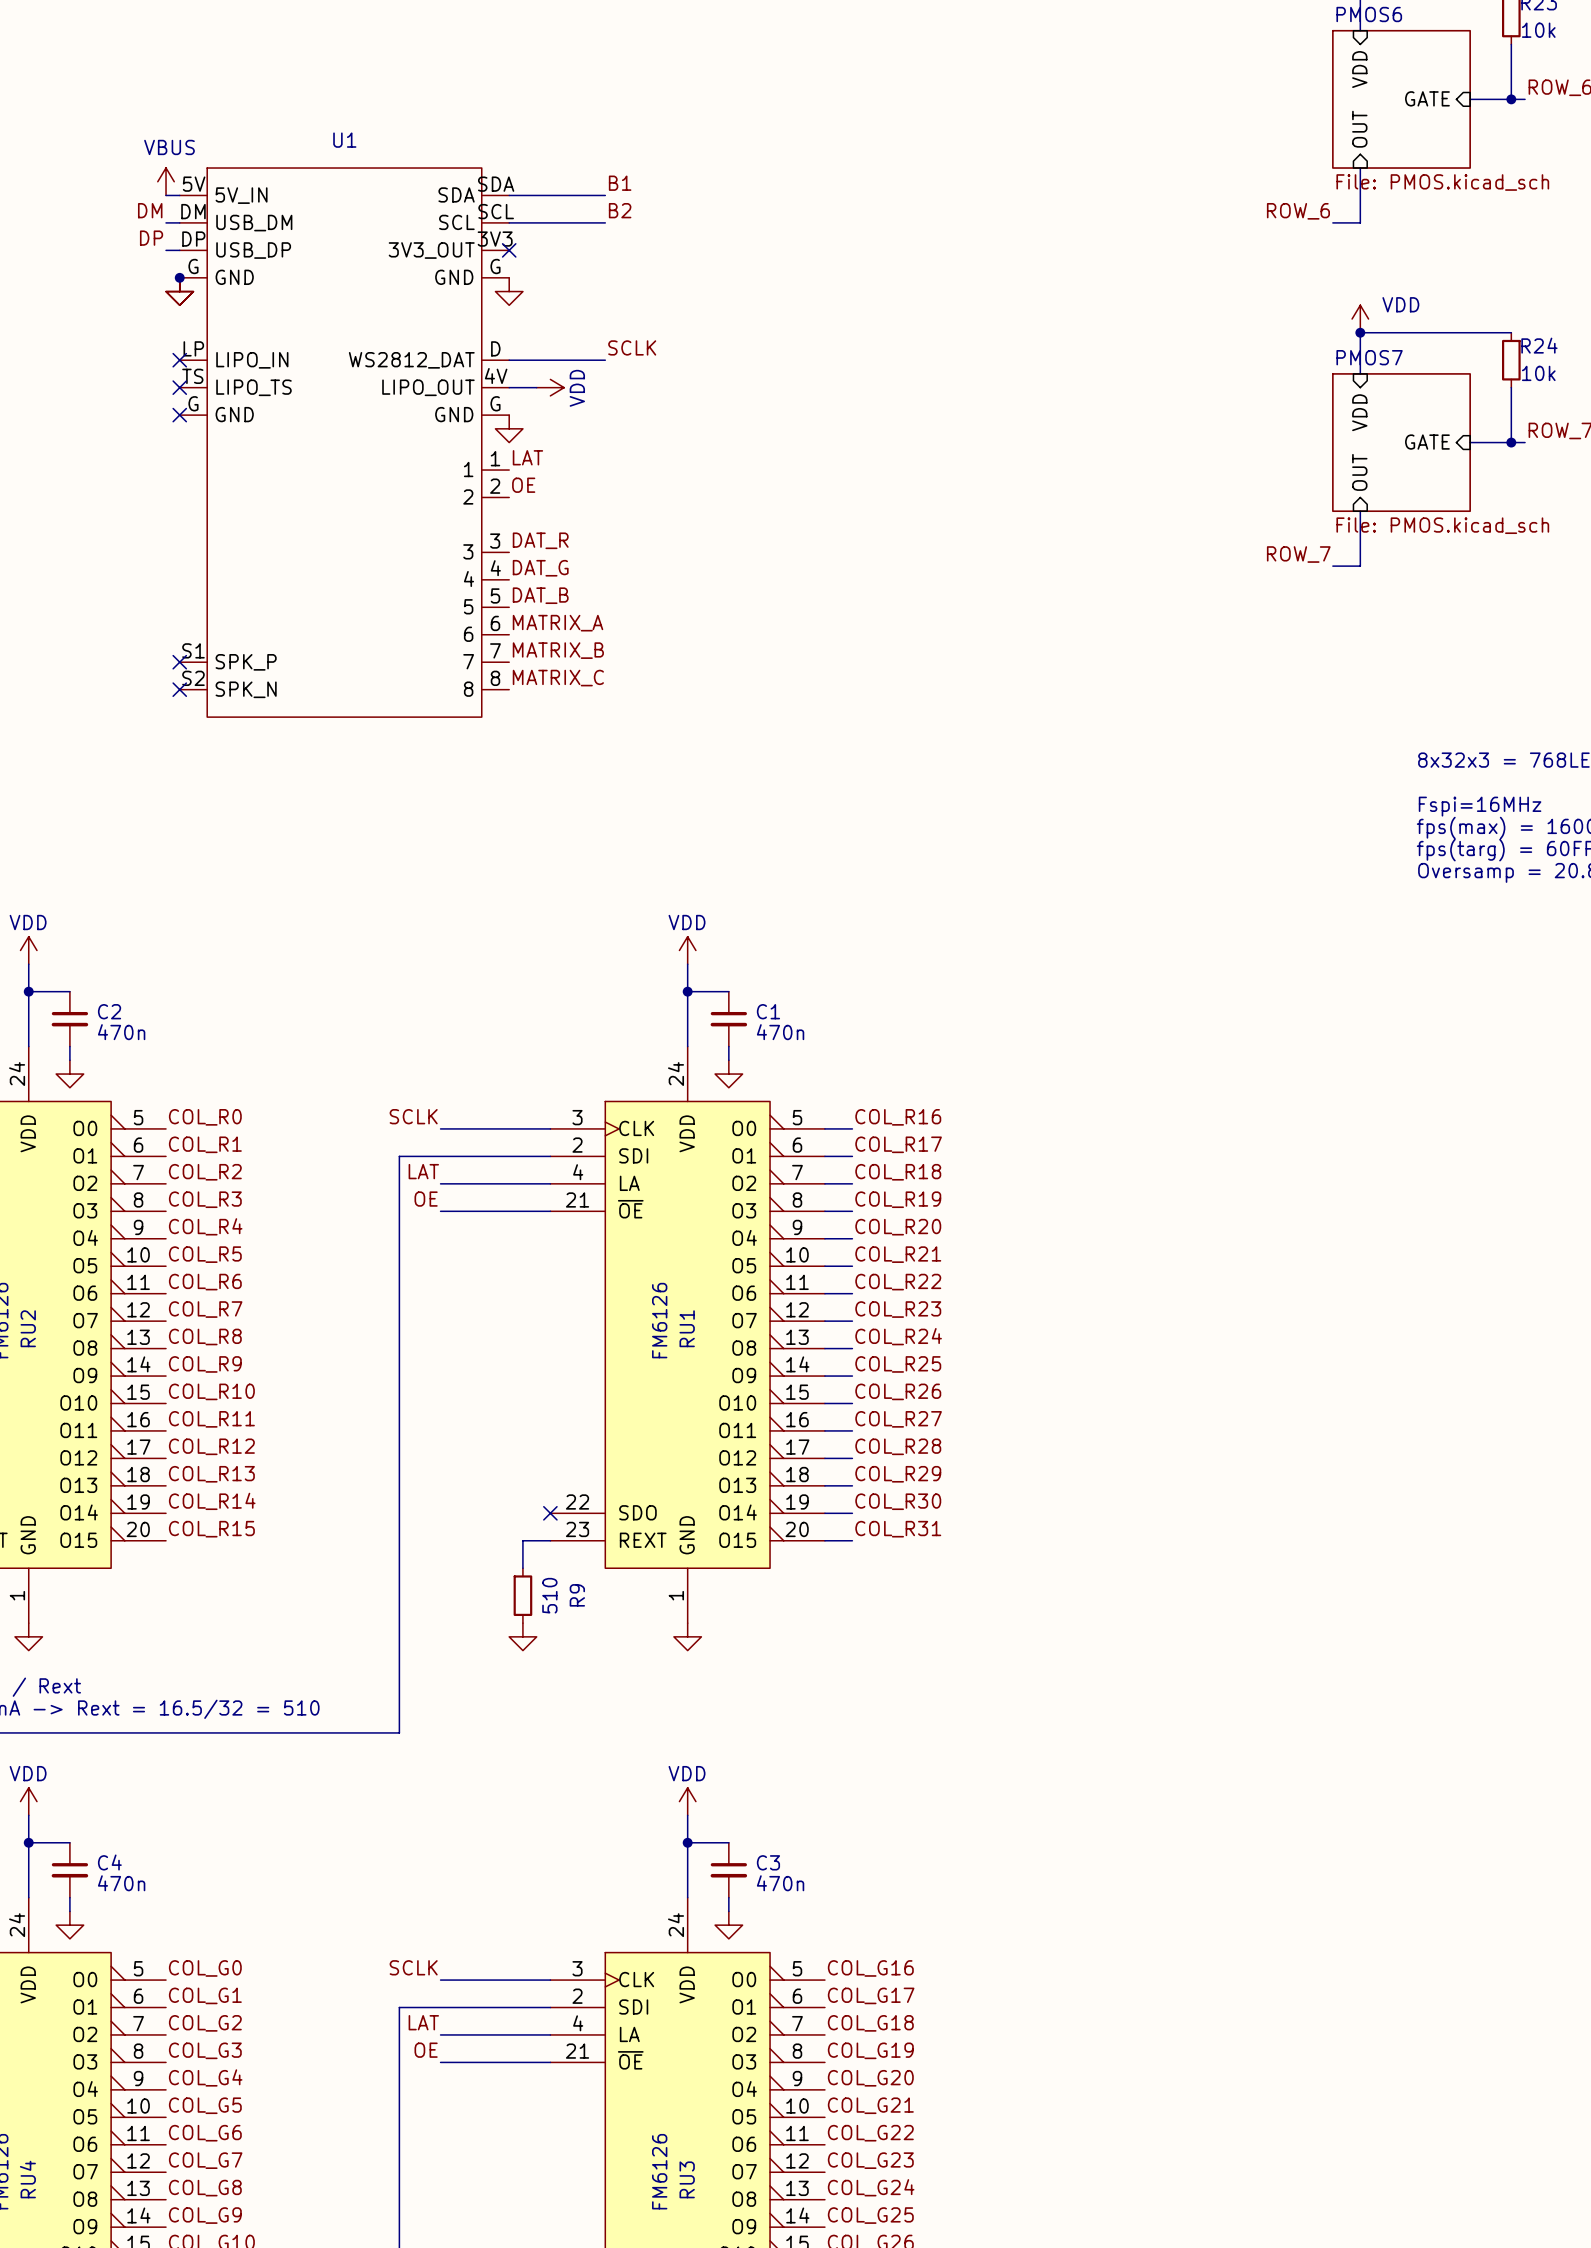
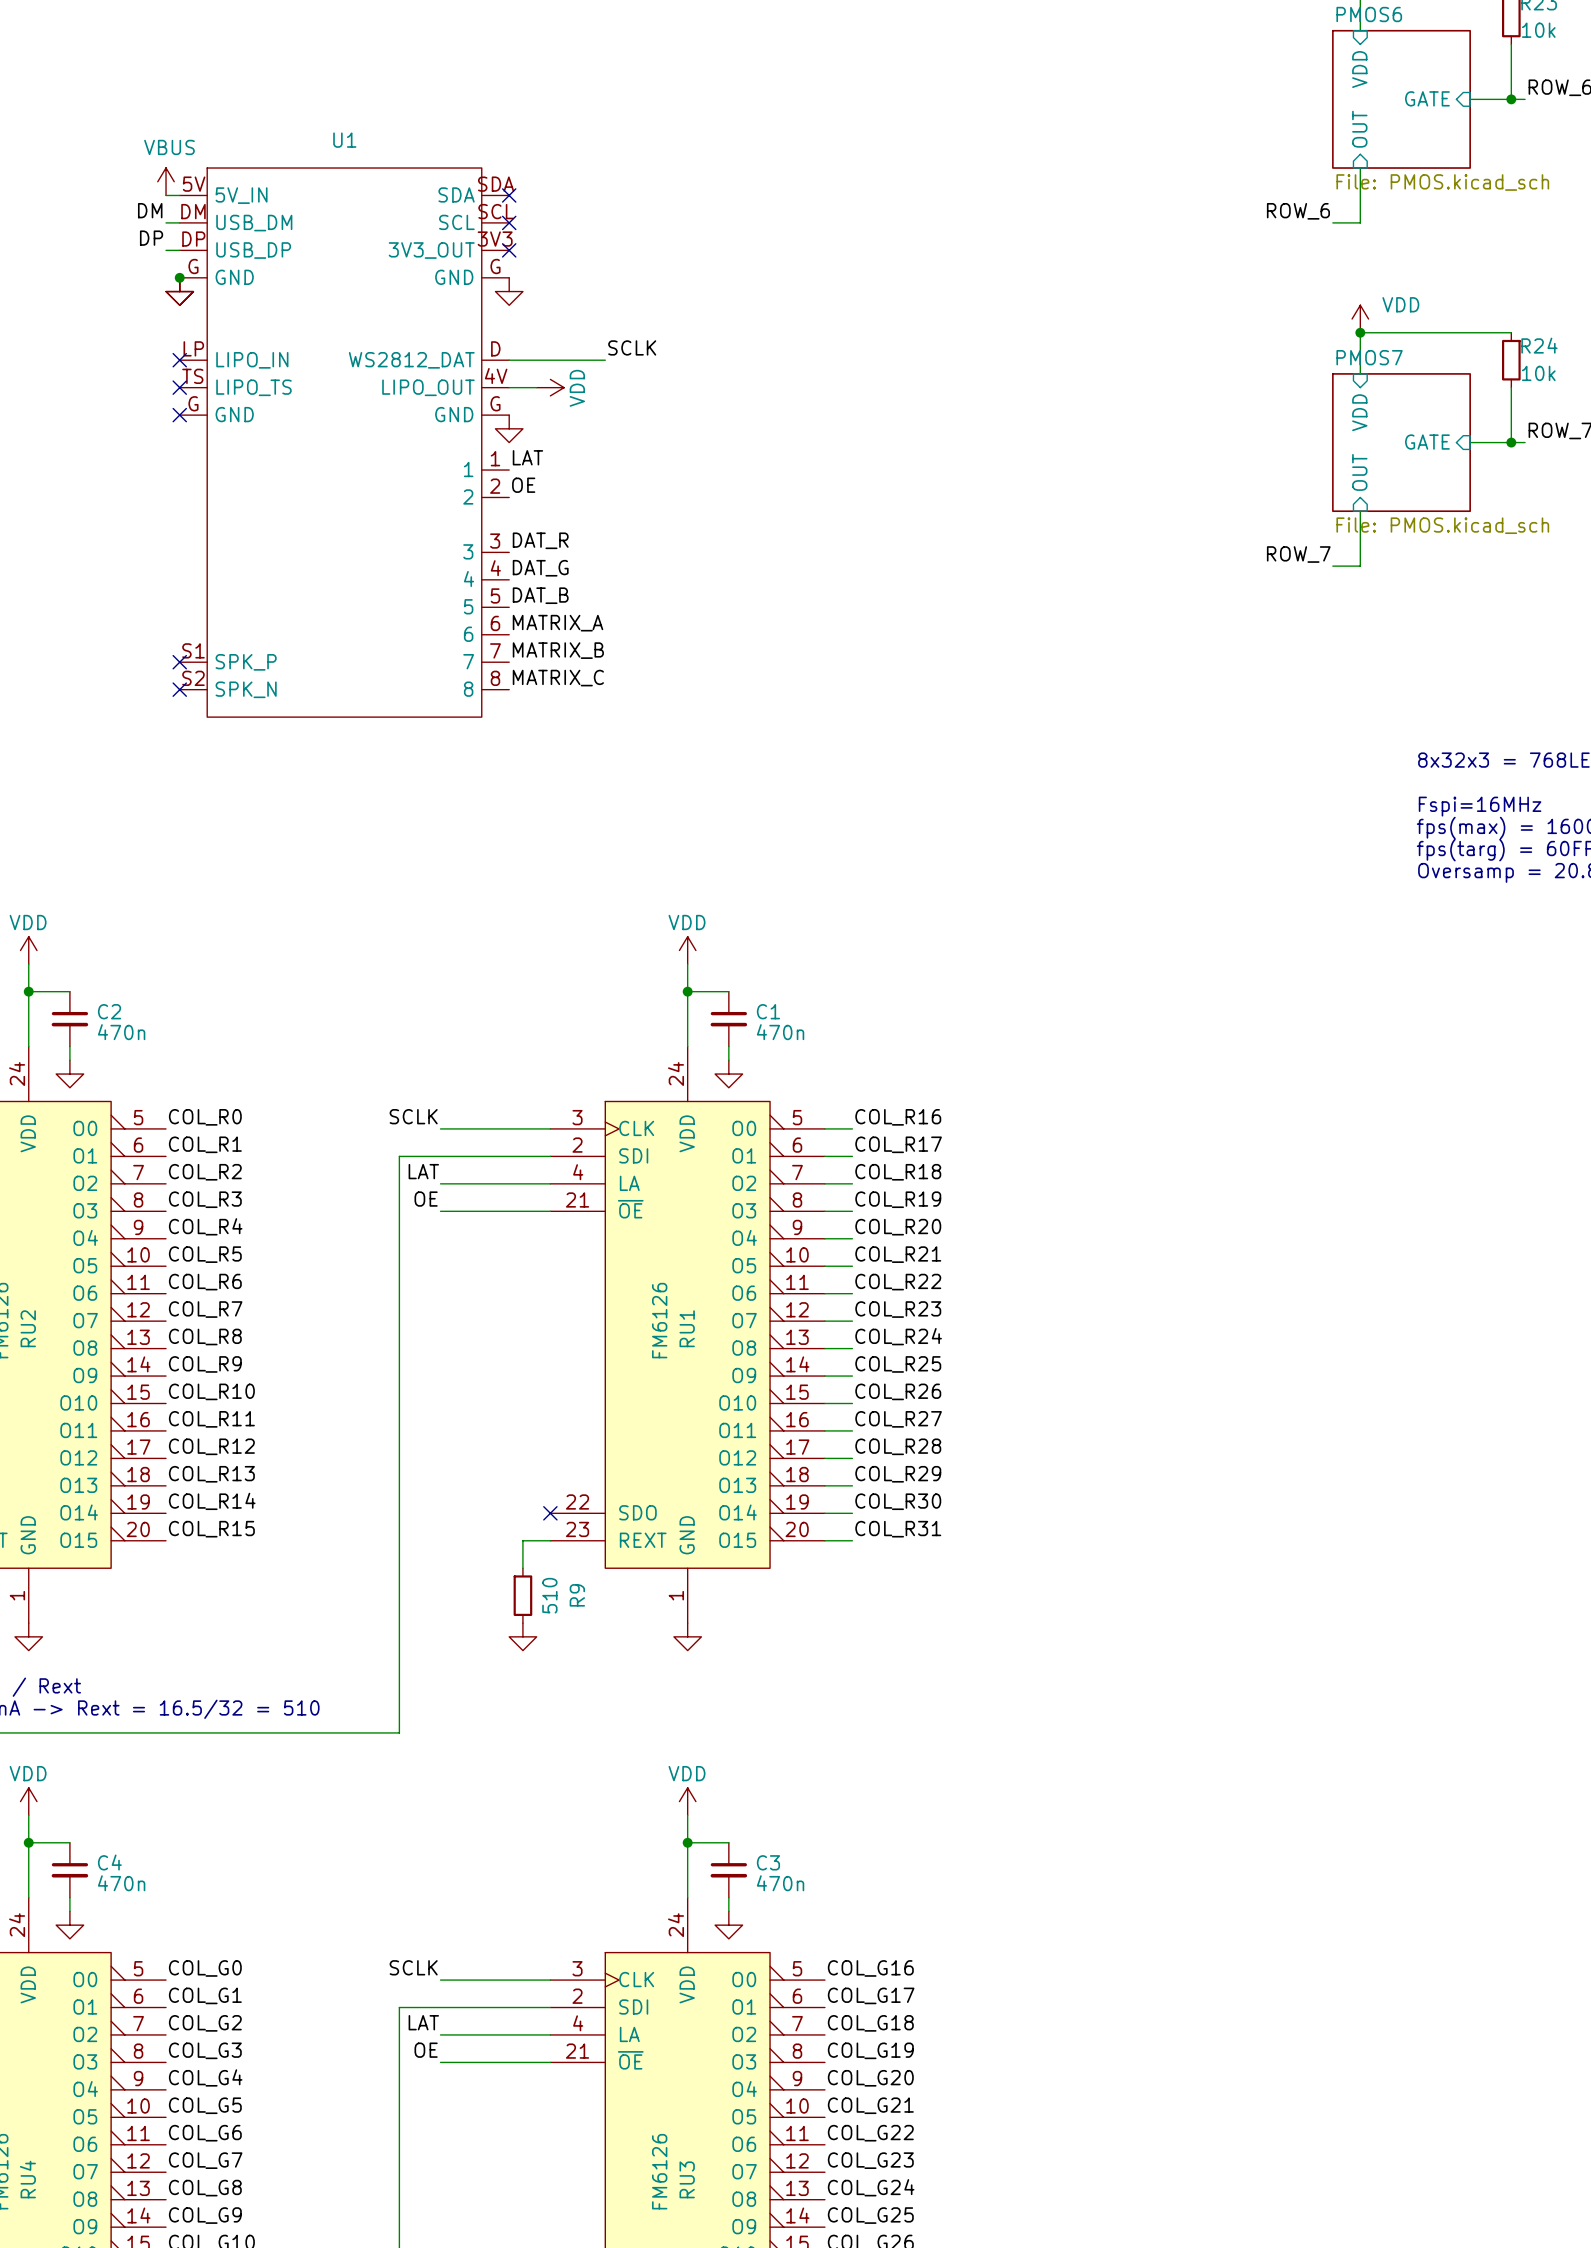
label: B1 (620, 183) -> none
wire: (509, 195) (605, 195) -> none
no-connect mark: none -> (509, 195)
label: B2 (620, 210) -> none
wire: (509, 222) (605, 222) -> none
no-connect mark: none -> (509, 222)

